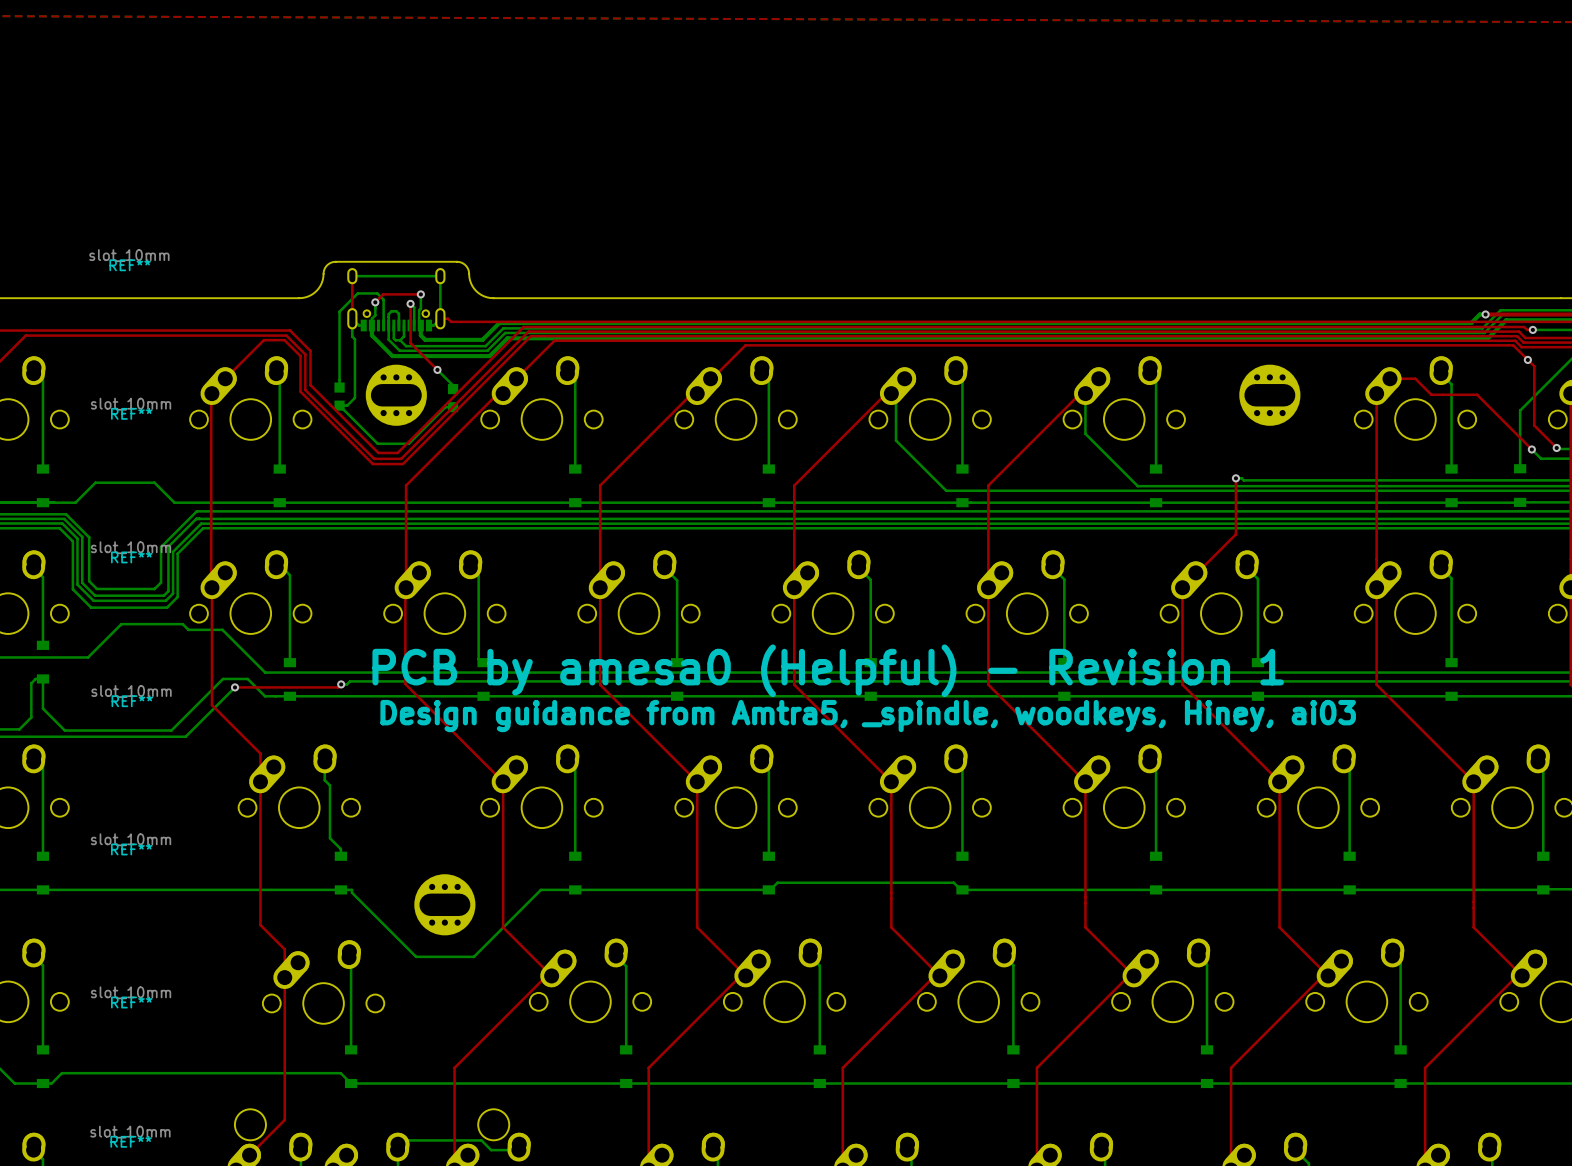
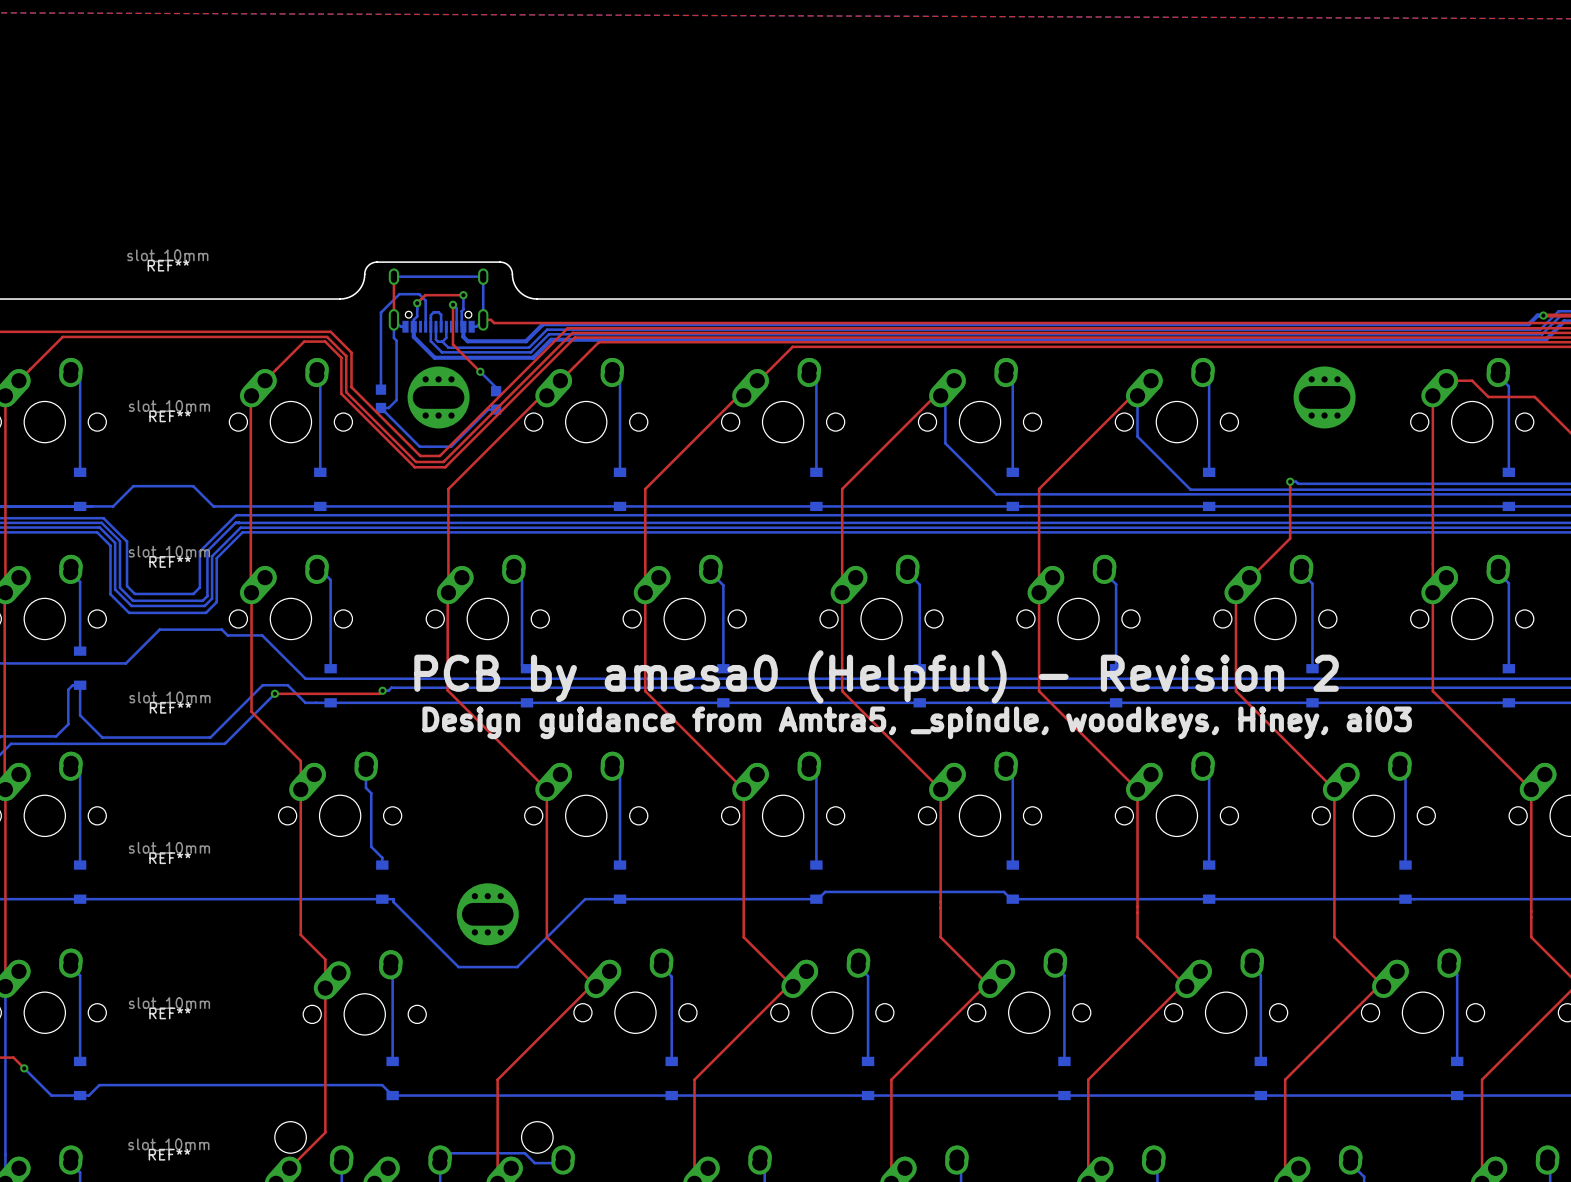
text: PCB by amesa0 (Helpful) - Revision 1 (828, 670) -> PCB by amesa0 (Helpful) - Revision 2 (876, 676)

